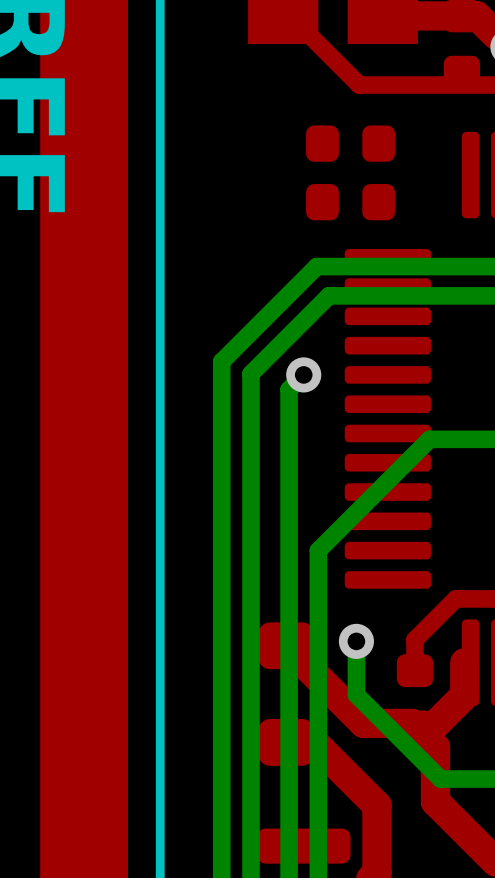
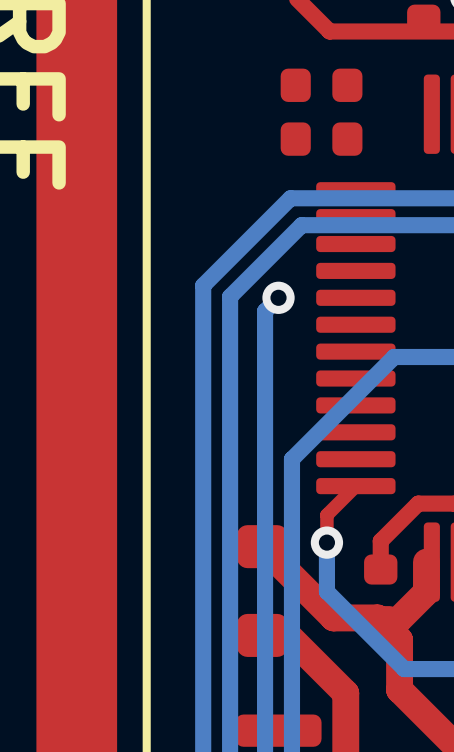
top track: none -> (355, 486) (326, 515) (326, 542)

